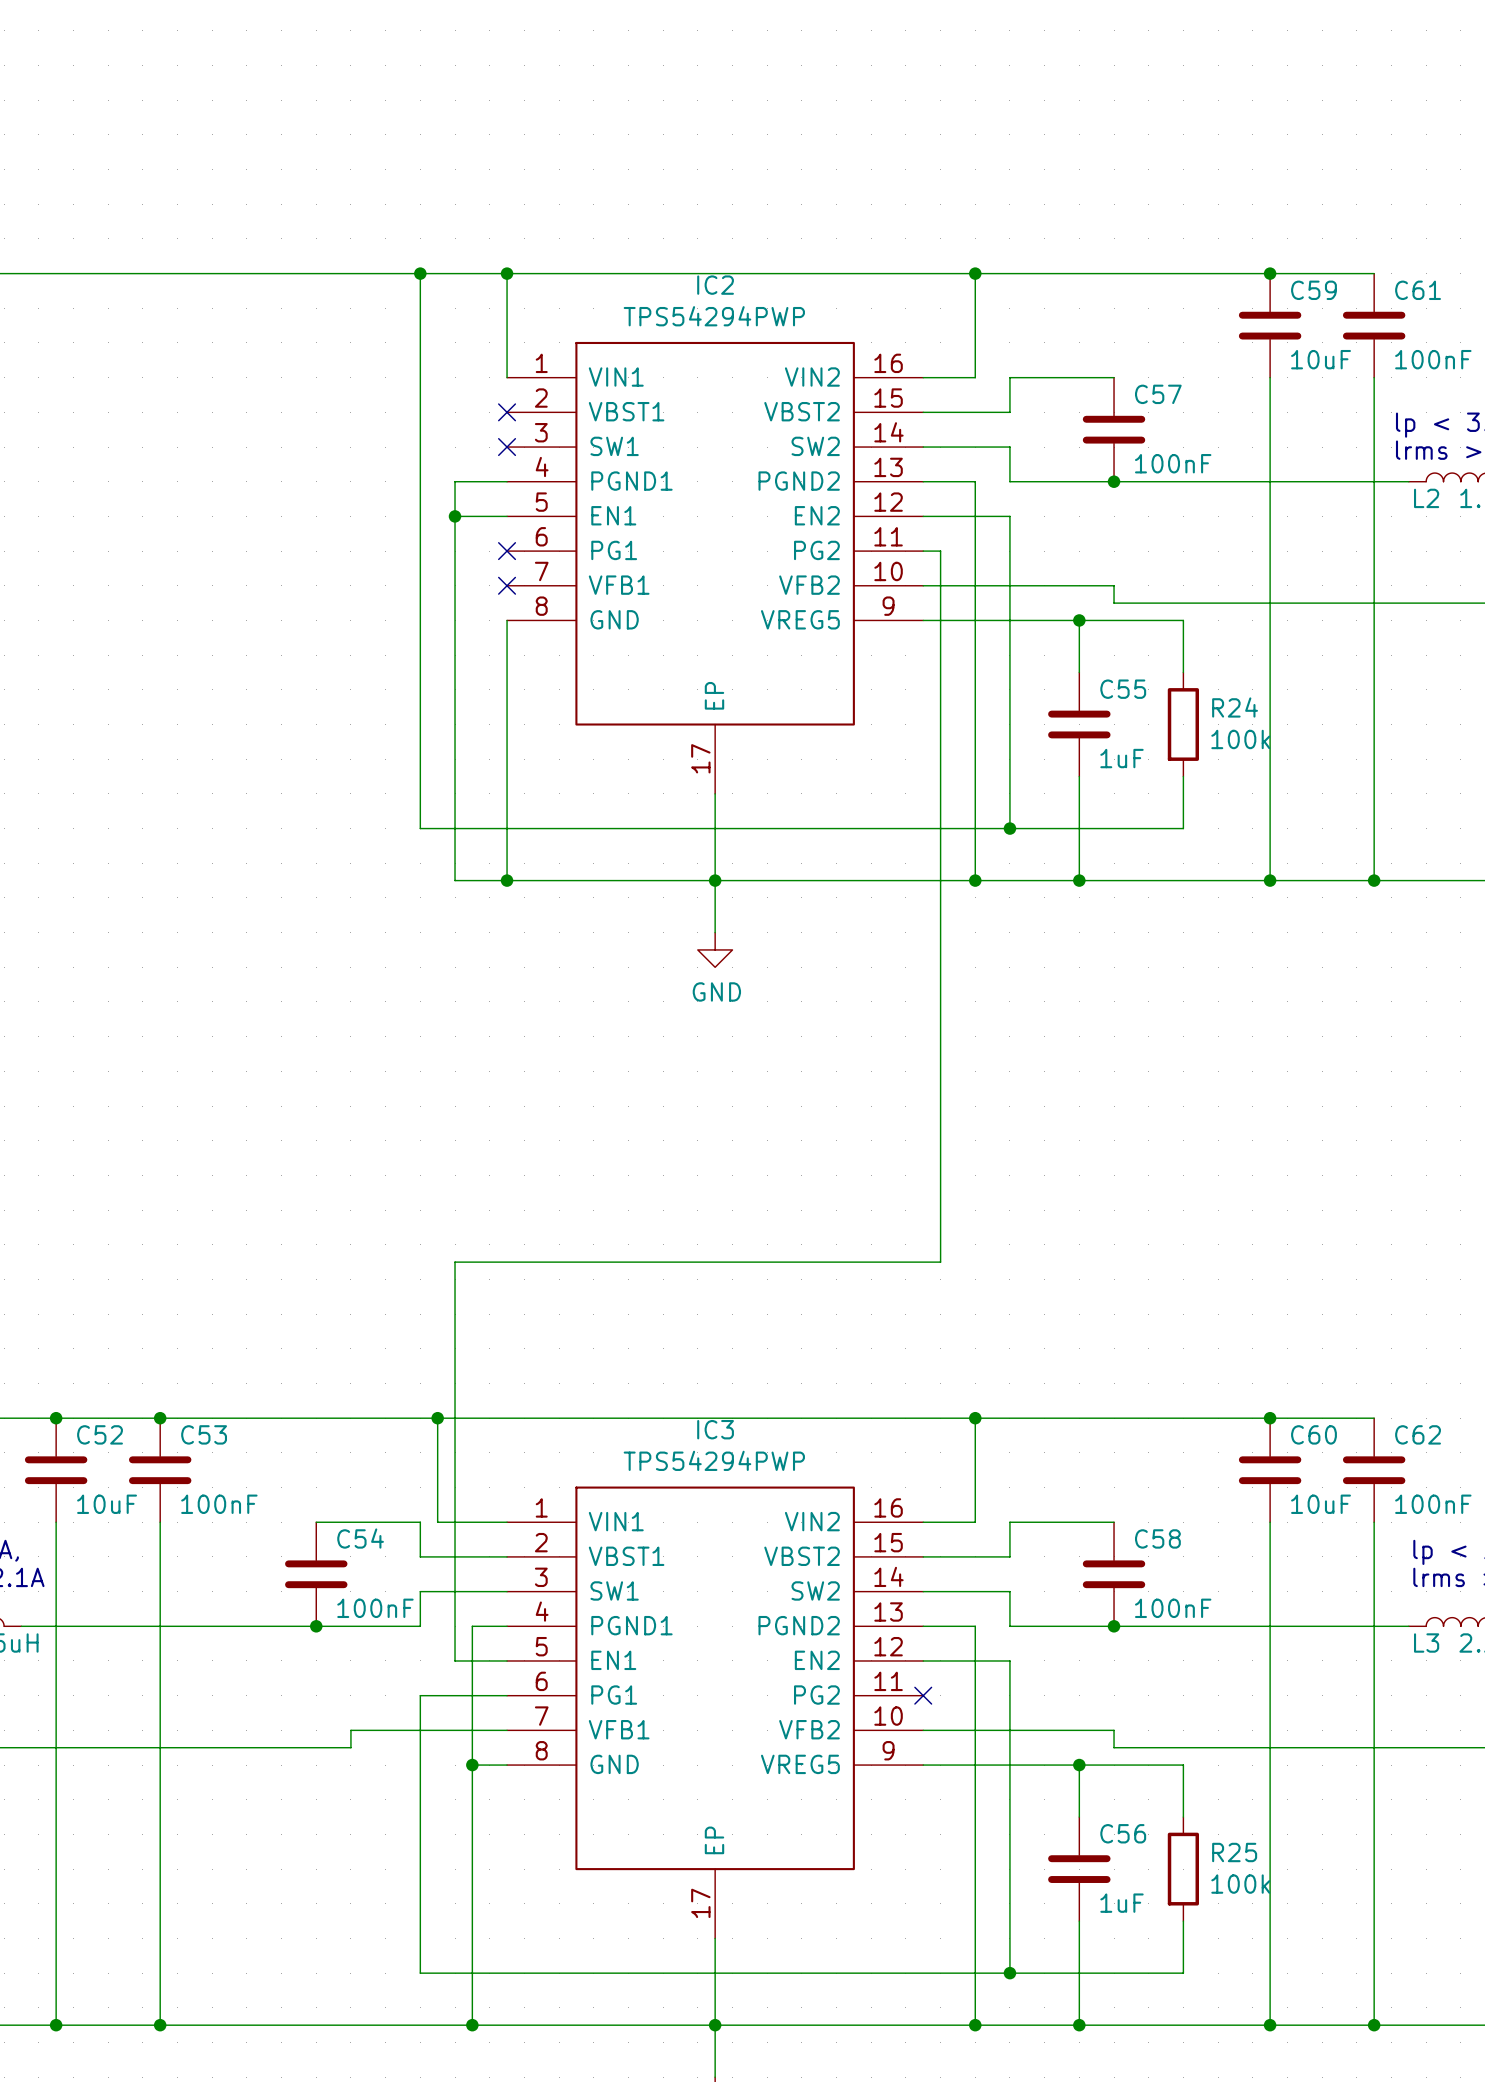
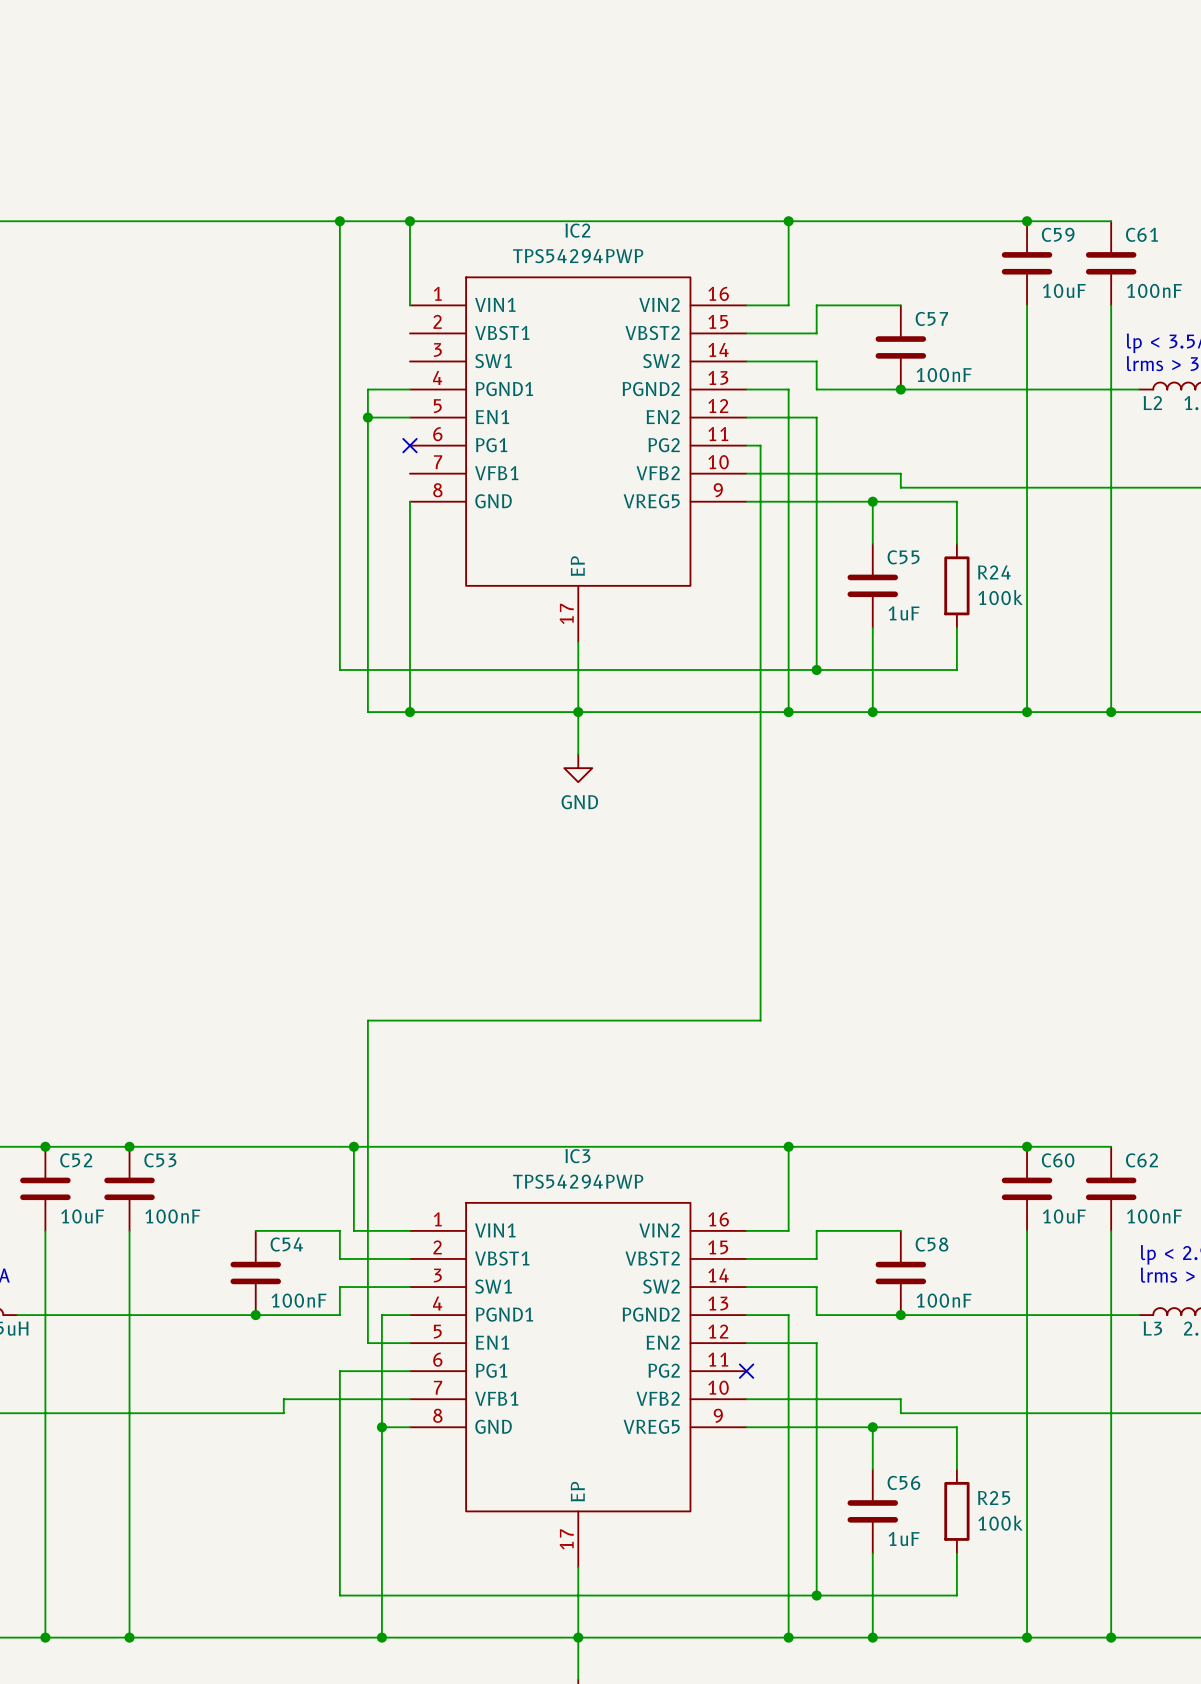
no-connect mark: (507, 412) -> none
no-connect mark: (507, 447) -> none
no-connect mark: (507, 585) -> none

